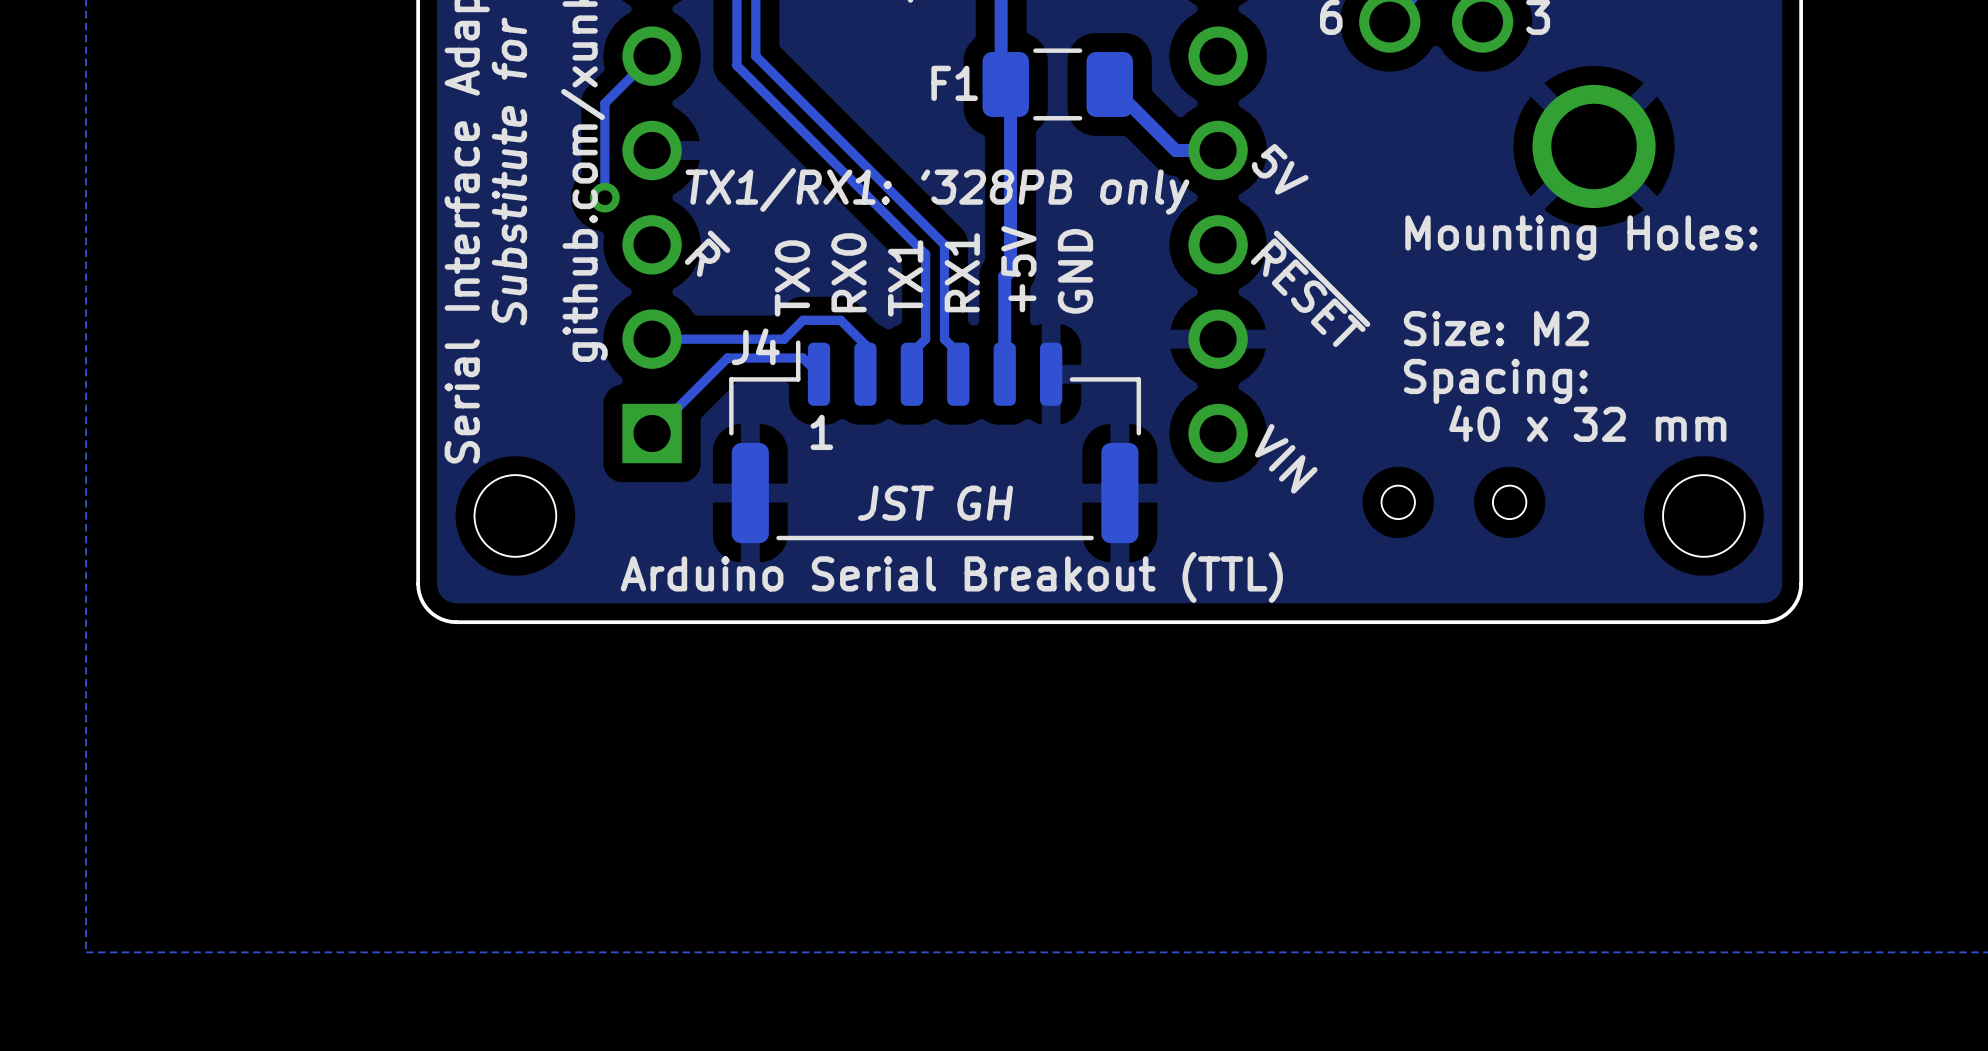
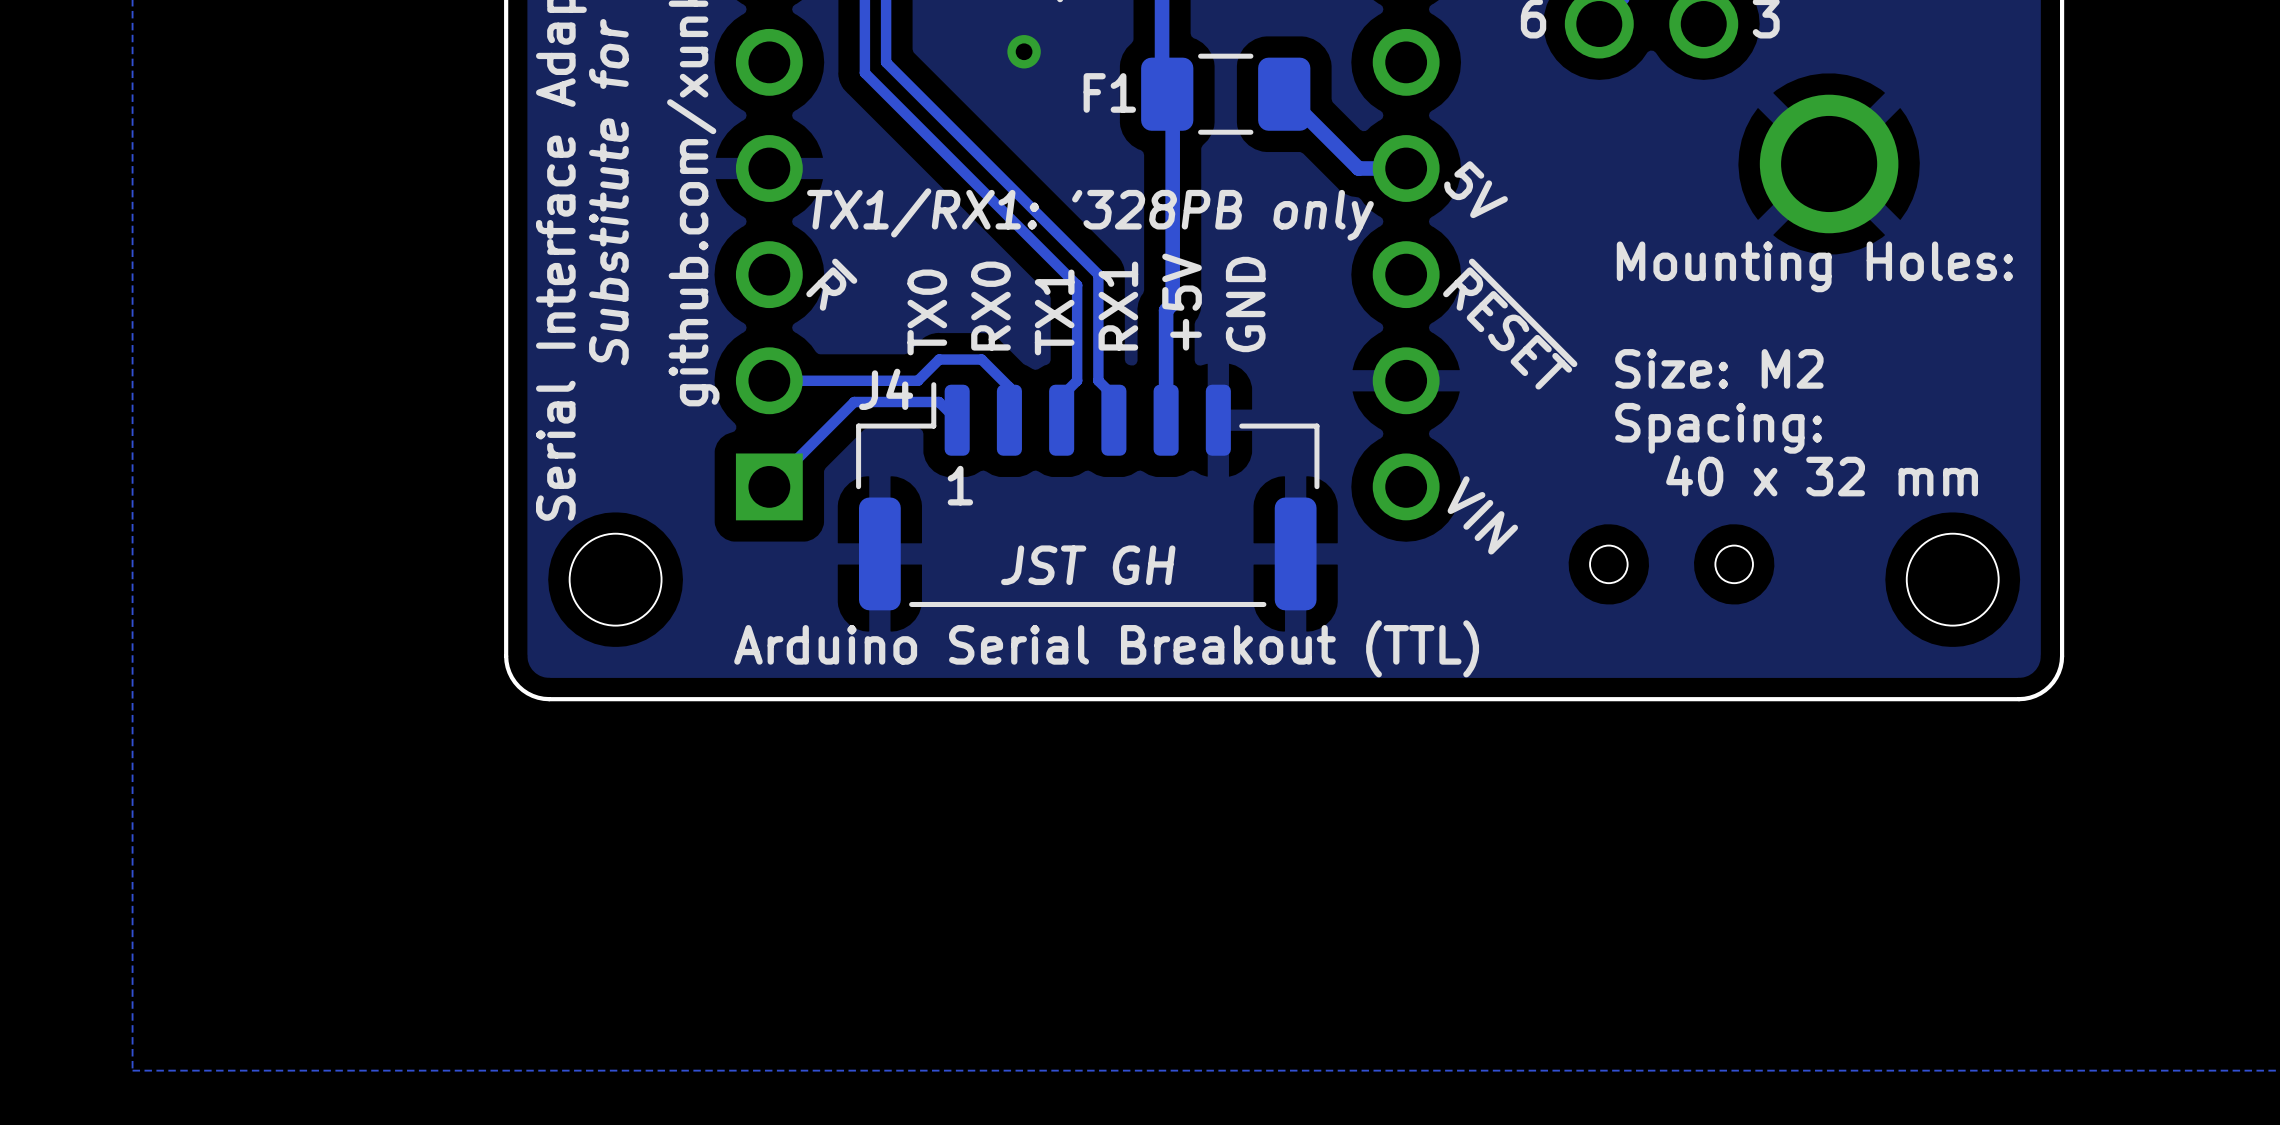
via: none -> (1024, 51)
track: (652, 56) (604, 103) (604, 197) -> none
via: (604, 197) -> none

